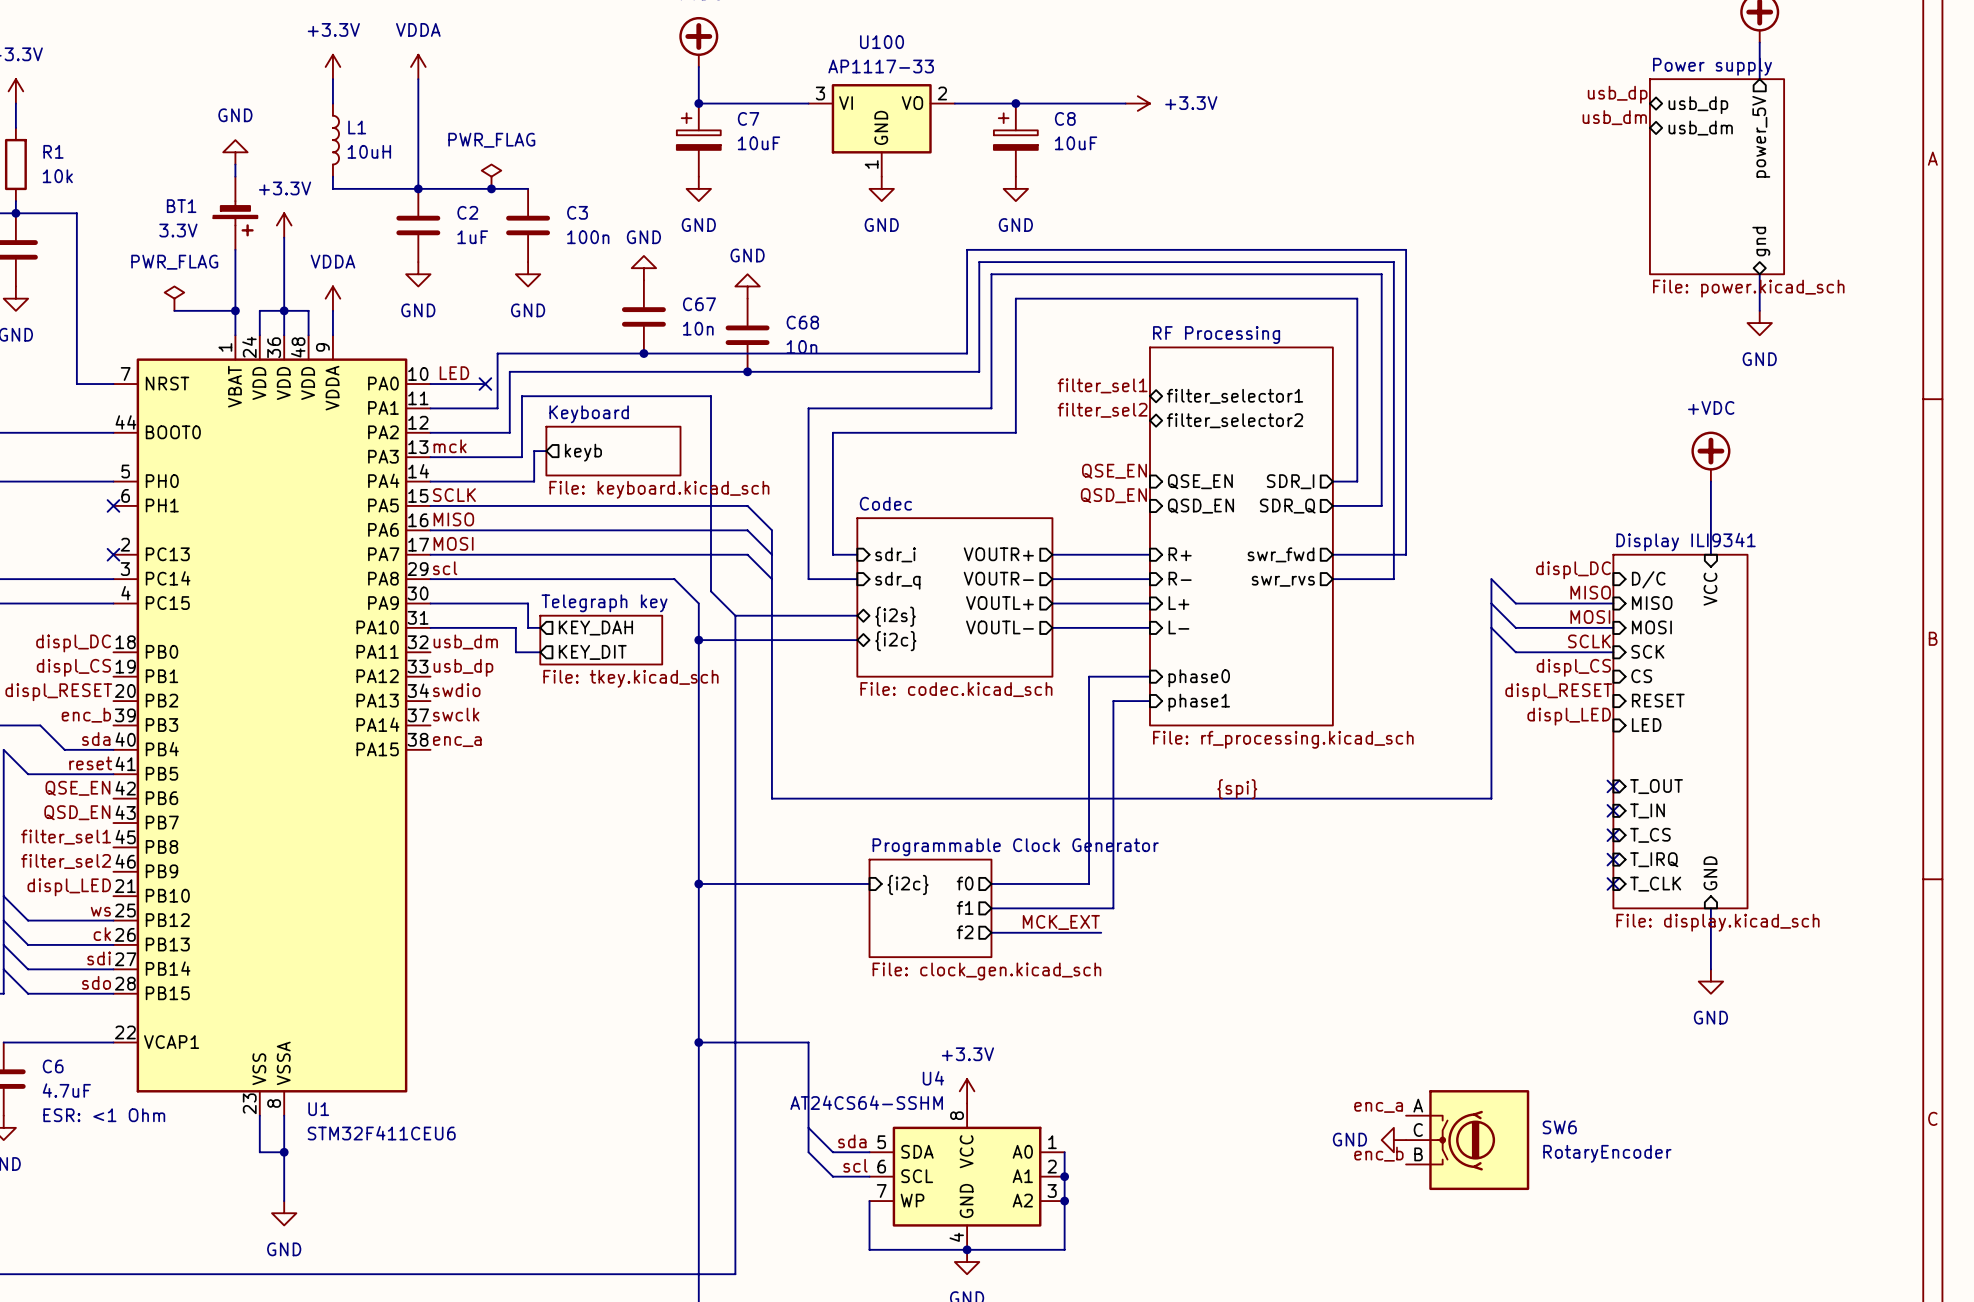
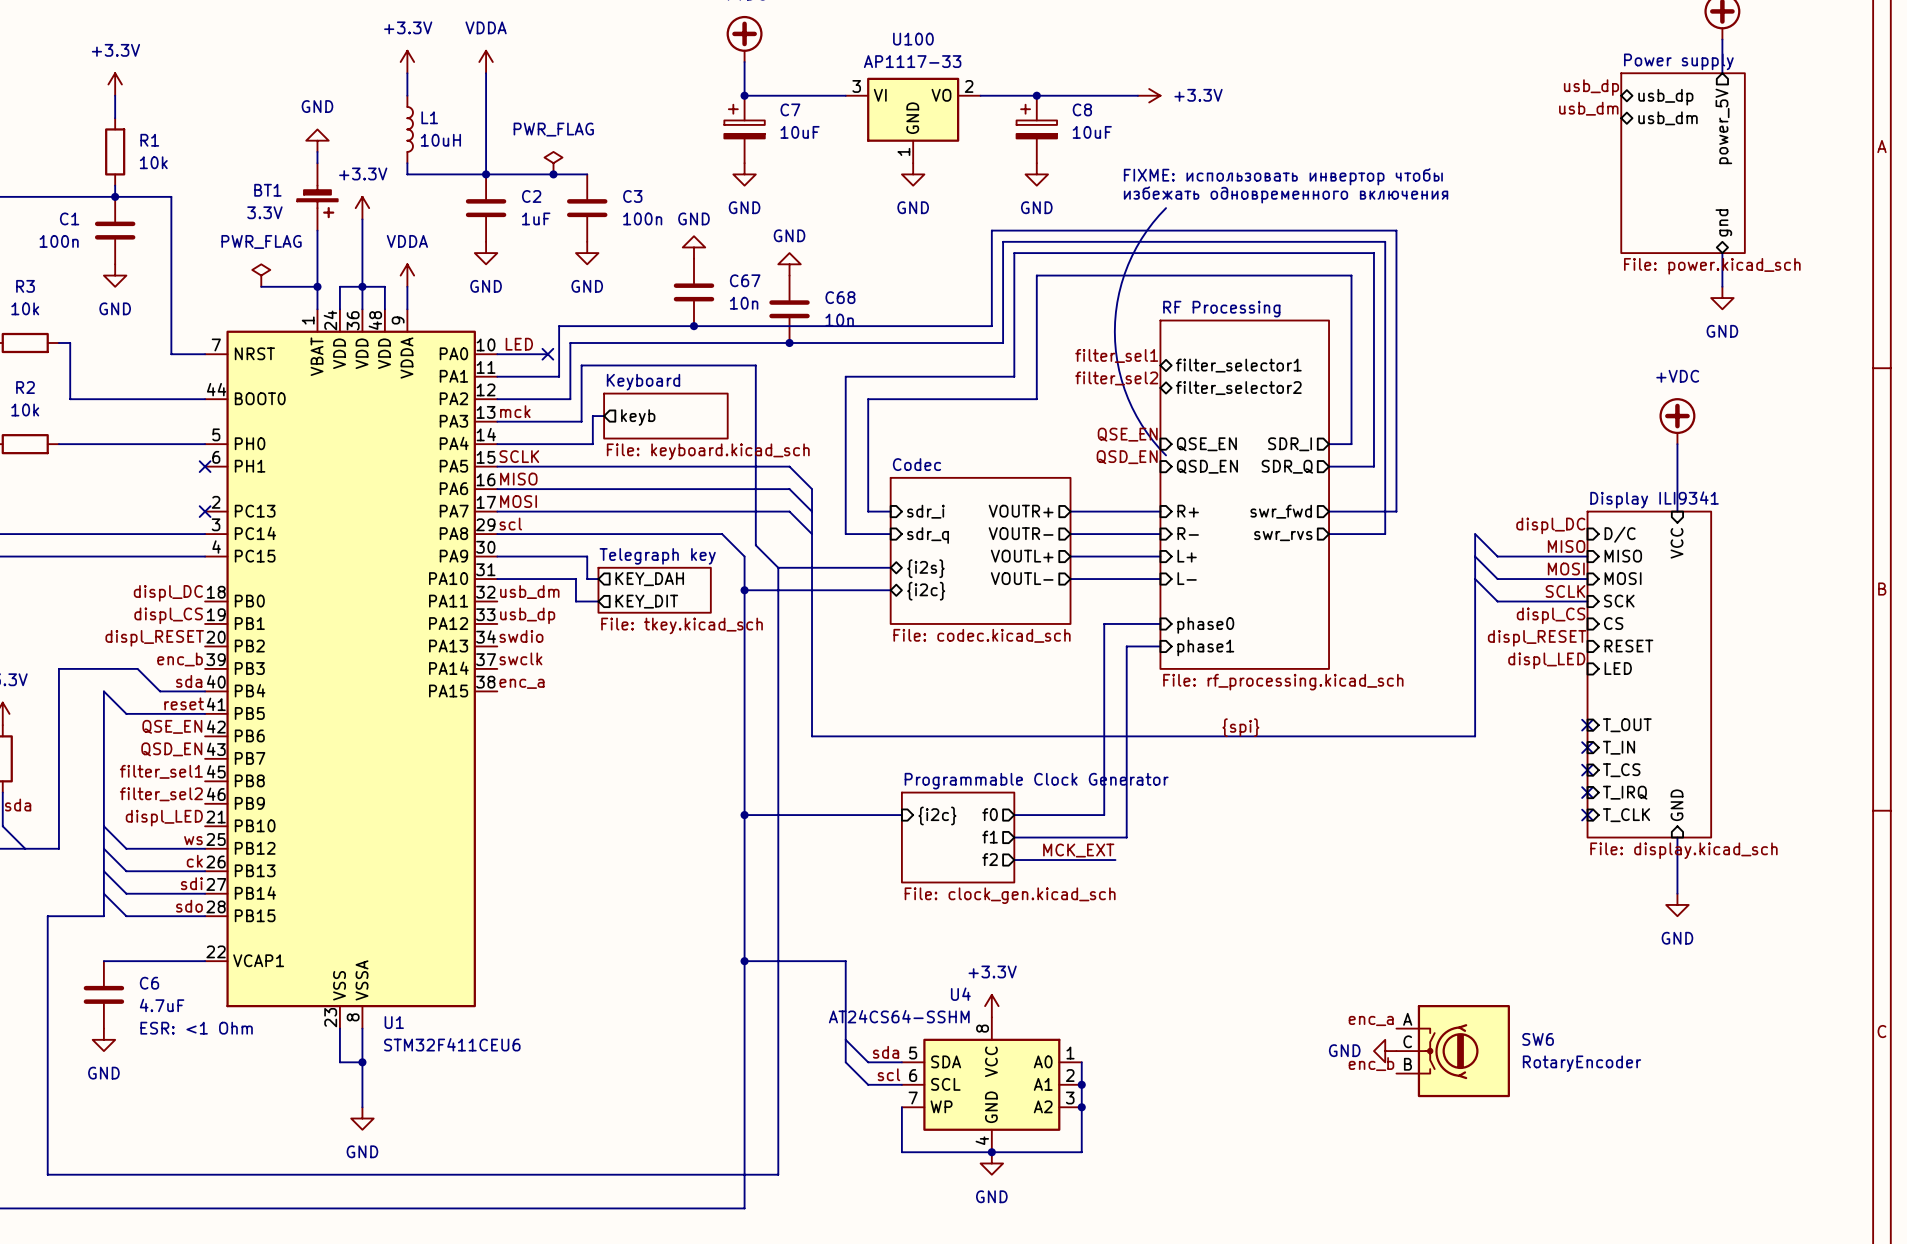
text: none -> FIXME: использовать инвертор чтобы (1283, 176)
text: none -> избежать одновременного включения (1286, 194)
line: none -> (1166, 208) (1147, 230) (1128, 264) (1117, 302) (1114, 331) (1119, 370) (1128, 398) (1147, 432) (1166, 455)

